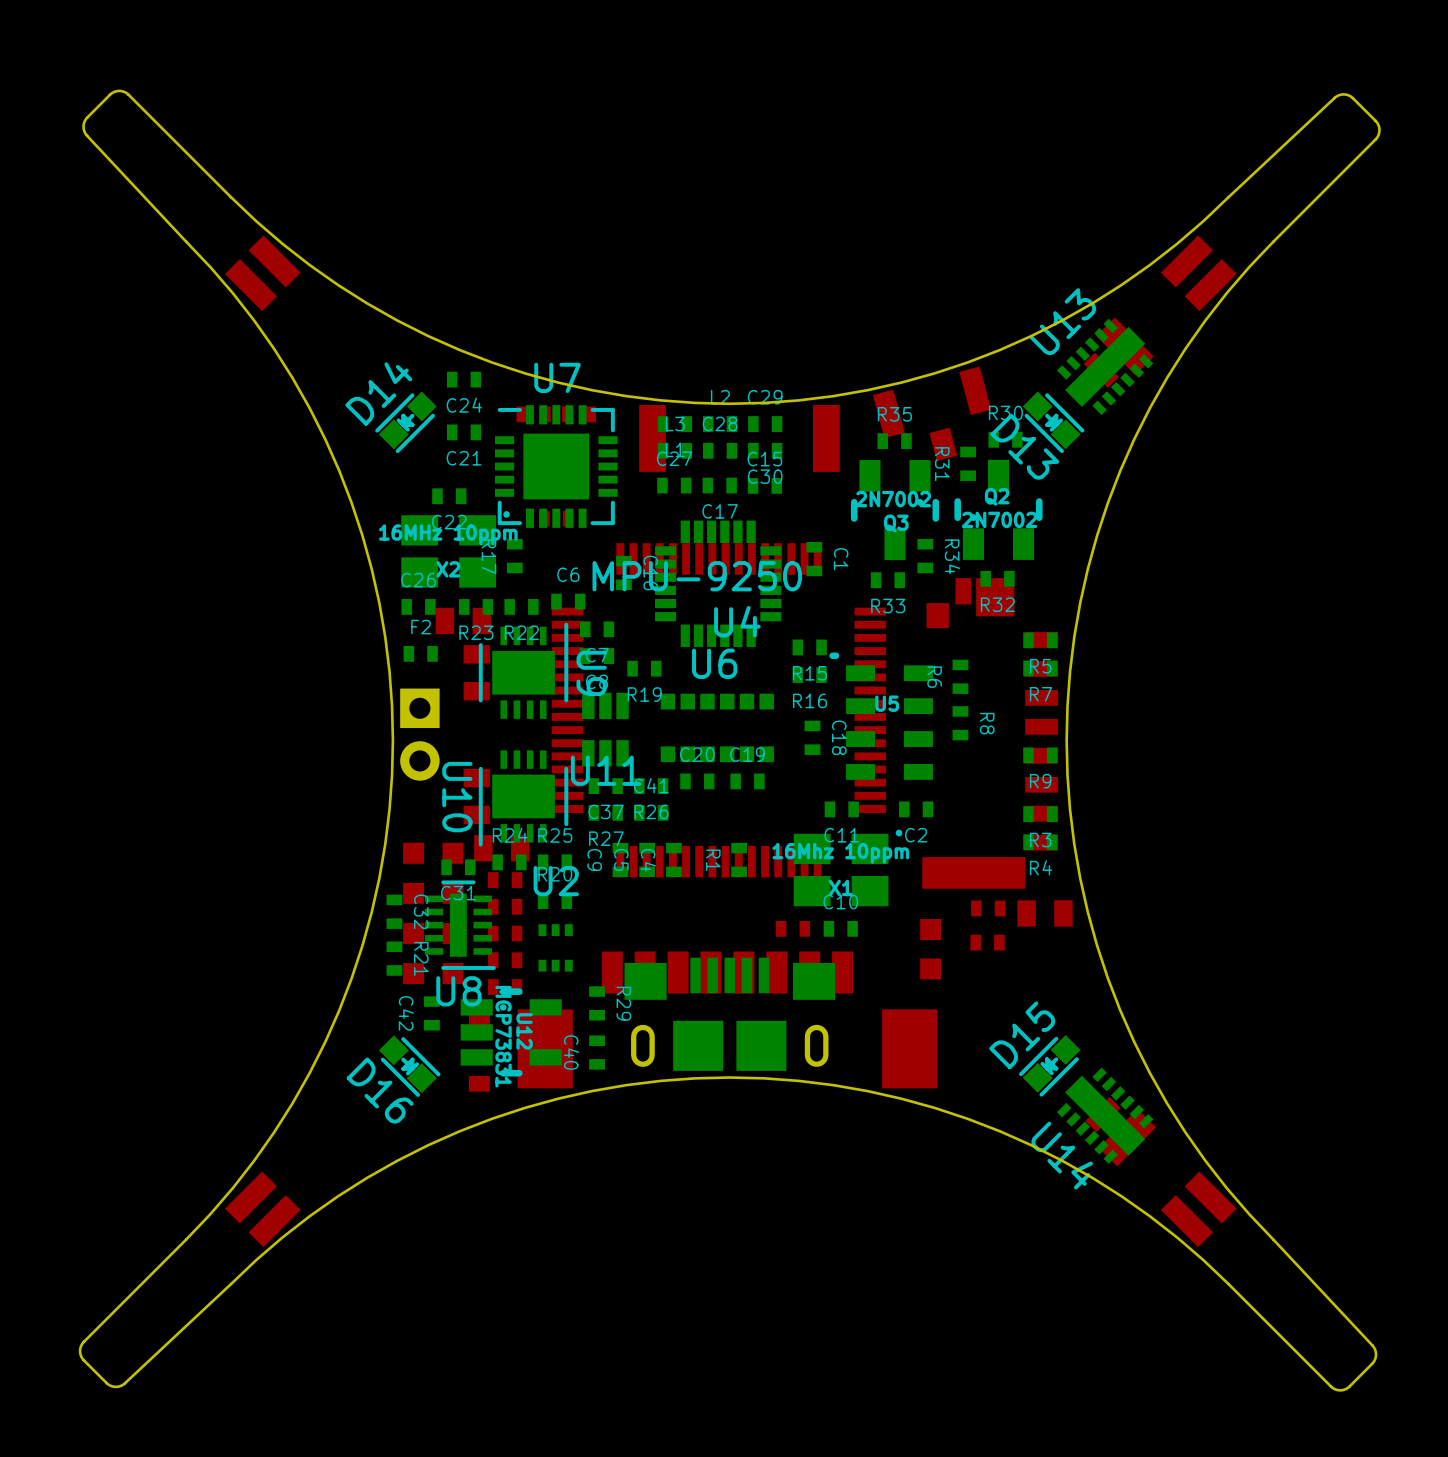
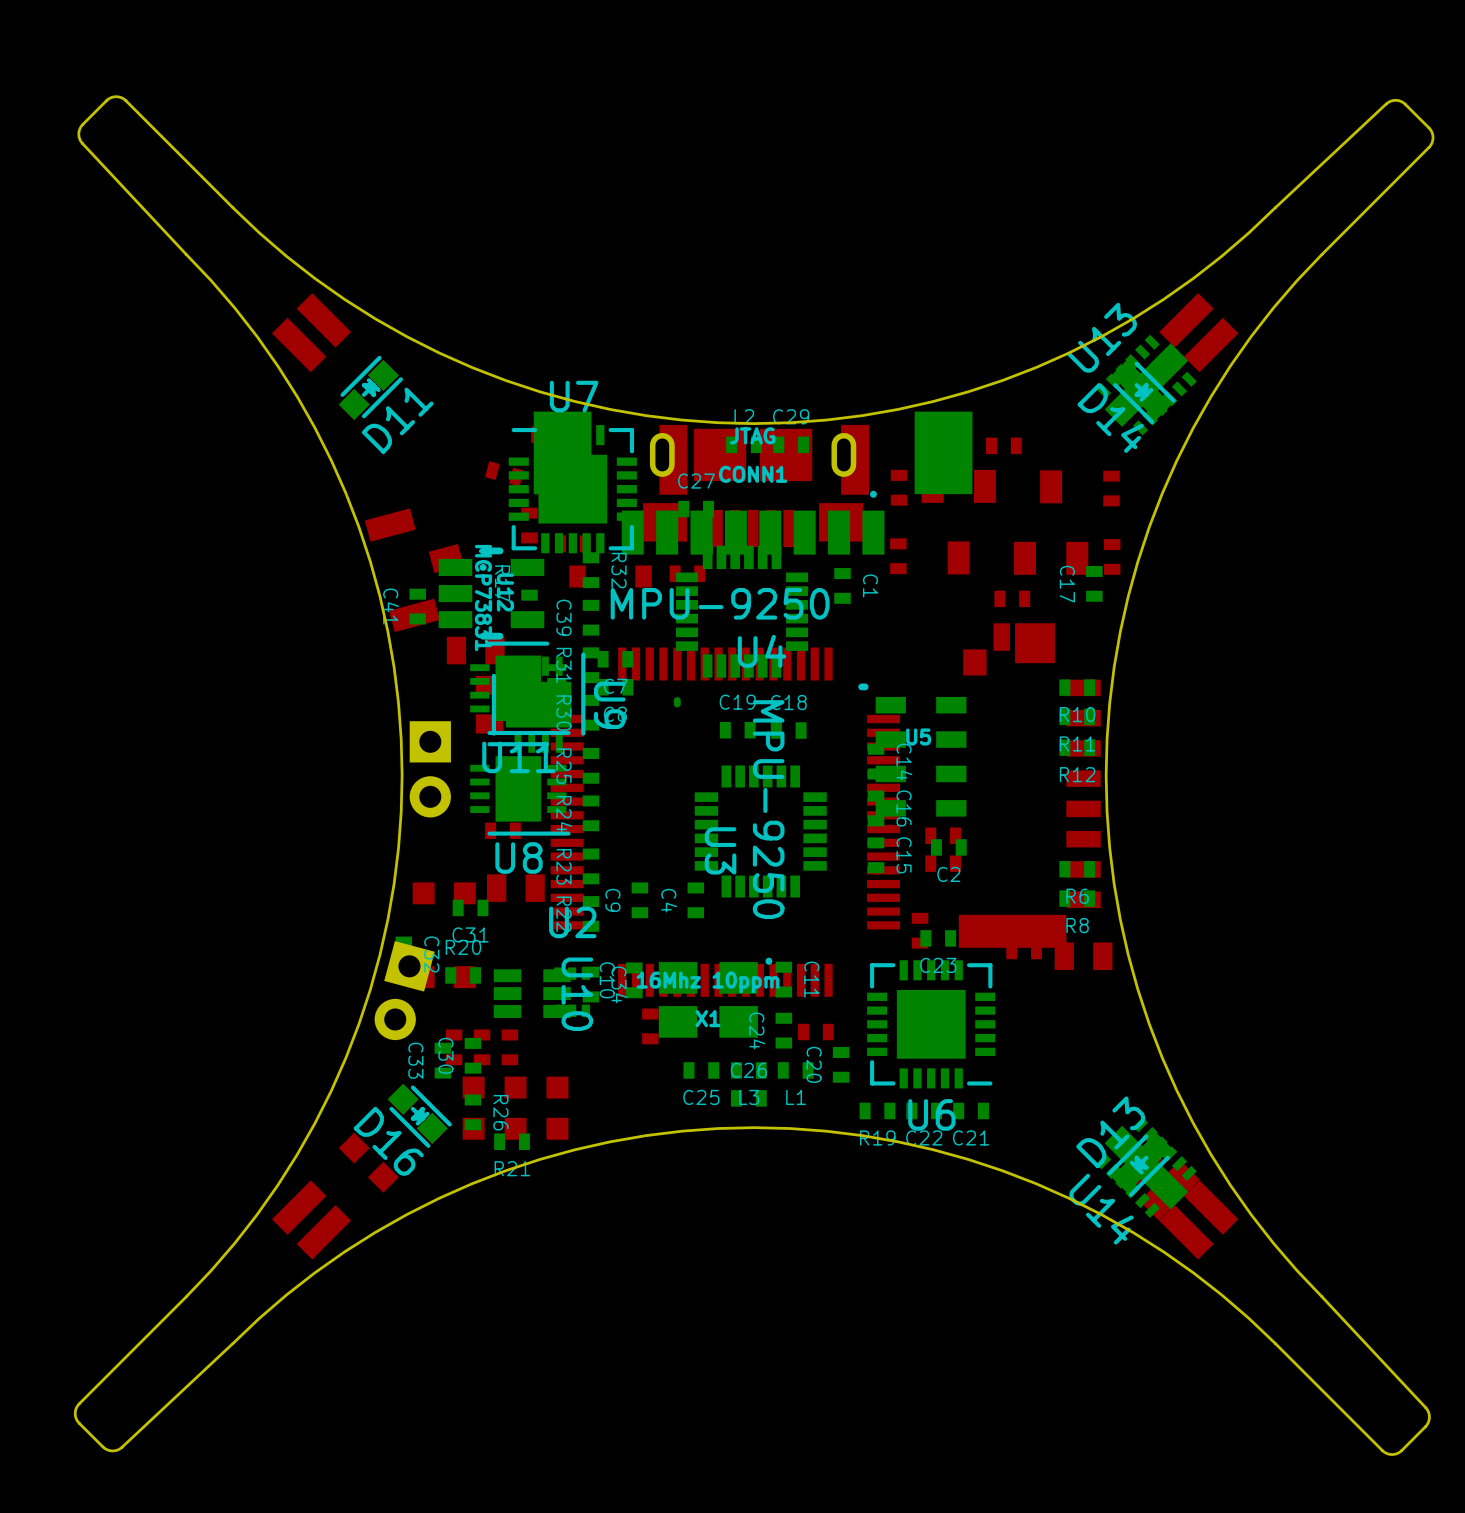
part position: (262, 273) -> (311, 332)
part position: (1198, 273) -> (1198, 332)
part: (1124, 346) -> none
D11: none -> (370, 387)
C24 rotation: 0° (464, 379) -> 90° clockwise (783, 1030)
C24 position: (464, 379) -> (783, 1030)
part rotation: 0° (932, 413) -> 90° counterclockwise (414, 570)
part position: (932, 413) -> (414, 570)
part: (579, 414) -> none
D14 rotation: 0° (405, 422) -> 90° counterclockwise (1143, 392)
D14 position: (405, 422) -> (1143, 392)
D13 rotation: 0° (1053, 422) -> 90° clockwise (1139, 1164)
D13 position: (1053, 422) -> (1139, 1164)
L3 name position: L3 (675, 423) -> L3 (749, 1097)
L1 position: (674, 424) -> (795, 1070)
C21 position: (464, 432) -> (971, 1110)
R30 rotation: 0° (1005, 439) -> 90° clockwise (590, 712)
R30 position: (1005, 439) -> (590, 712)
R35 side: bottom (894, 441) -> top (1003, 445)
L3 position: (674, 450) -> (748, 1070)
C28: (720, 450) -> none
C30 rotation: 0° (765, 450) -> 90° clockwise (472, 1055)
C30 position: (765, 450) -> (472, 1055)
part: none -> (504, 473)
R31 position: (968, 463) -> (590, 665)
part: none -> (1111, 488)
C17 rotation: 0° (719, 485) -> 90° clockwise (1094, 583)
C17 position: (719, 485) -> (1094, 583)
C15 rotation: 0° (764, 485) -> 90° clockwise (876, 855)
C15 position: (764, 485) -> (876, 855)
C22 position: (449, 496) -> (924, 1110)
part: none -> (529, 525)
Q2 side: bottom (998, 509) -> top (1051, 522)
Q3 side: bottom (894, 510) -> top (958, 522)
part: none -> (1112, 556)
part: none -> (687, 573)
X2: 16MHz 10ppm (455, 549) -> none
R34 side: bottom (925, 556) -> top (898, 556)
part: none -> (1012, 598)
C16 position: (623, 572) -> (876, 808)
R32 rotation: 0° (997, 578) -> 90° clockwise (590, 570)
R32 position: (997, 578) -> (590, 570)
R33 side: bottom (887, 580) -> top (899, 487)
C39: none -> (590, 617)
C6 side: bottom (568, 601) -> top (920, 930)
C26 position: (418, 606) -> (748, 1098)
R23 rotation: 0° (476, 606) -> 90° clockwise (590, 866)
R23 position: (476, 606) -> (590, 866)
R22 rotation: 0° (521, 606) -> 90° clockwise (590, 913)
R22 position: (521, 606) -> (590, 913)
R5: (1040, 640) -> none
R15: (809, 647) -> none
F2: (420, 653) -> none
R10: none -> (1077, 687)
U6 name position: U6 (714, 663) -> U6 (931, 1114)
R19 position: (644, 668) -> (877, 1110)
R7: (1040, 668) -> none
R16: (809, 675) -> none
R6 rotation: 0° (960, 676) -> 90° clockwise (1077, 869)
R6 position: (960, 676) -> (1077, 869)
R11: none -> (1077, 716)
U11 footprint: [582, 692, 629, 767] -> [470, 641, 571, 736]
U6 footprint: [660, 693, 774, 763] -> [867, 960, 996, 1089]
part position: (718, 710) -> (725, 822)
R12: none -> (1077, 747)
R8 rotation: 0° (960, 723) -> 90° clockwise (1077, 898)
R8 position: (960, 723) -> (1077, 898)
C14: none -> (876, 761)
part position: (990, 733) -> (1029, 785)
C18 rotation: 0° (812, 737) -> 90° clockwise (788, 730)
C18 position: (812, 737) -> (788, 730)
U10 footprint: [478, 750, 569, 847] -> [493, 969, 571, 1018]
R9: (1040, 755) -> none
C20 rotation: 0° (697, 781) -> 90° clockwise (841, 1064)
C20 position: (697, 781) -> (841, 1064)
C19 position: (747, 781) -> (737, 730)
C37: (605, 786) -> none
R26 rotation: 0° (651, 786) -> 90° clockwise (472, 1112)
R26 position: (651, 786) -> (472, 1112)
U3: none -> MPU-9250 (760, 831)
part: (476, 796) -> none
U10 name position: U10 (457, 797) -> U10 (577, 994)
part: none -> (943, 835)
C11 rotation: 0° (841, 809) -> 90° clockwise (783, 979)
C11 position: (841, 809) -> (783, 979)
R27 side: bottom (605, 812) -> top (502, 830)
C41 rotation: 0° (651, 812) -> 90° clockwise (417, 606)
C41 position: (651, 812) -> (417, 606)
R3: (1040, 814) -> none
part: none -> (943, 863)
R4: (1040, 842) -> none
C5 side: bottom (647, 859) -> top (650, 1026)
R1 side: bottom (739, 859) -> top (815, 1032)
R24 rotation: 0° (509, 862) -> 90° clockwise (590, 813)
R24 position: (509, 862) -> (590, 813)
R25 rotation: 0° (554, 862) -> 90° clockwise (590, 765)
R25 position: (554, 862) -> (590, 765)
X1 position: (848, 867) -> (715, 997)
U8 footprint: [424, 880, 496, 970] -> [470, 742, 571, 836]
part: (505, 880) -> none
part: (433, 893) -> none
C23: none -> (938, 938)
R20 position: (554, 901) -> (463, 975)
part: (505, 906) -> none
part: (792, 928) -> none
C10 rotation: 0° (840, 928) -> 90° clockwise (634, 980)
C10 position: (840, 928) -> (634, 980)
part: (505, 933) -> none
C34: none -> (590, 984)
part: (987, 942) -> none
part: none -> (404, 990)
part: (930, 949) -> none
R21 rotation: 0° (394, 958) -> 90° clockwise (512, 1141)
R21 position: (394, 958) -> (512, 1141)
part: (505, 960) -> none
part: (433, 973) -> none
part rotation: 0° (505, 987) -> 90° clockwise (509, 1047)
part: none -> (454, 1047)
part: none -> (482, 1047)
R29: (597, 1003) -> none
C42 name: C42 (406, 1013) -> C33 (415, 1060)
part side: bottom (729, 1014) -> top (753, 487)
CONN1 side: top (727, 1019) -> bottom (753, 483)
C25: none -> (701, 1070)
U12 position: (511, 1032) -> (491, 593)
part rotation: 0° (479, 1052) -> 90° clockwise (610, 576)
part position: (479, 1052) -> (610, 576)
C40: (597, 1052) -> none
part: none -> (473, 1108)
part: none -> (515, 1108)
part: none -> (557, 1108)
D15: (1049, 1065) -> none
part: none -> (368, 1162)
part position: (262, 1209) -> (311, 1219)
part position: (1198, 1209) -> (1198, 1219)

